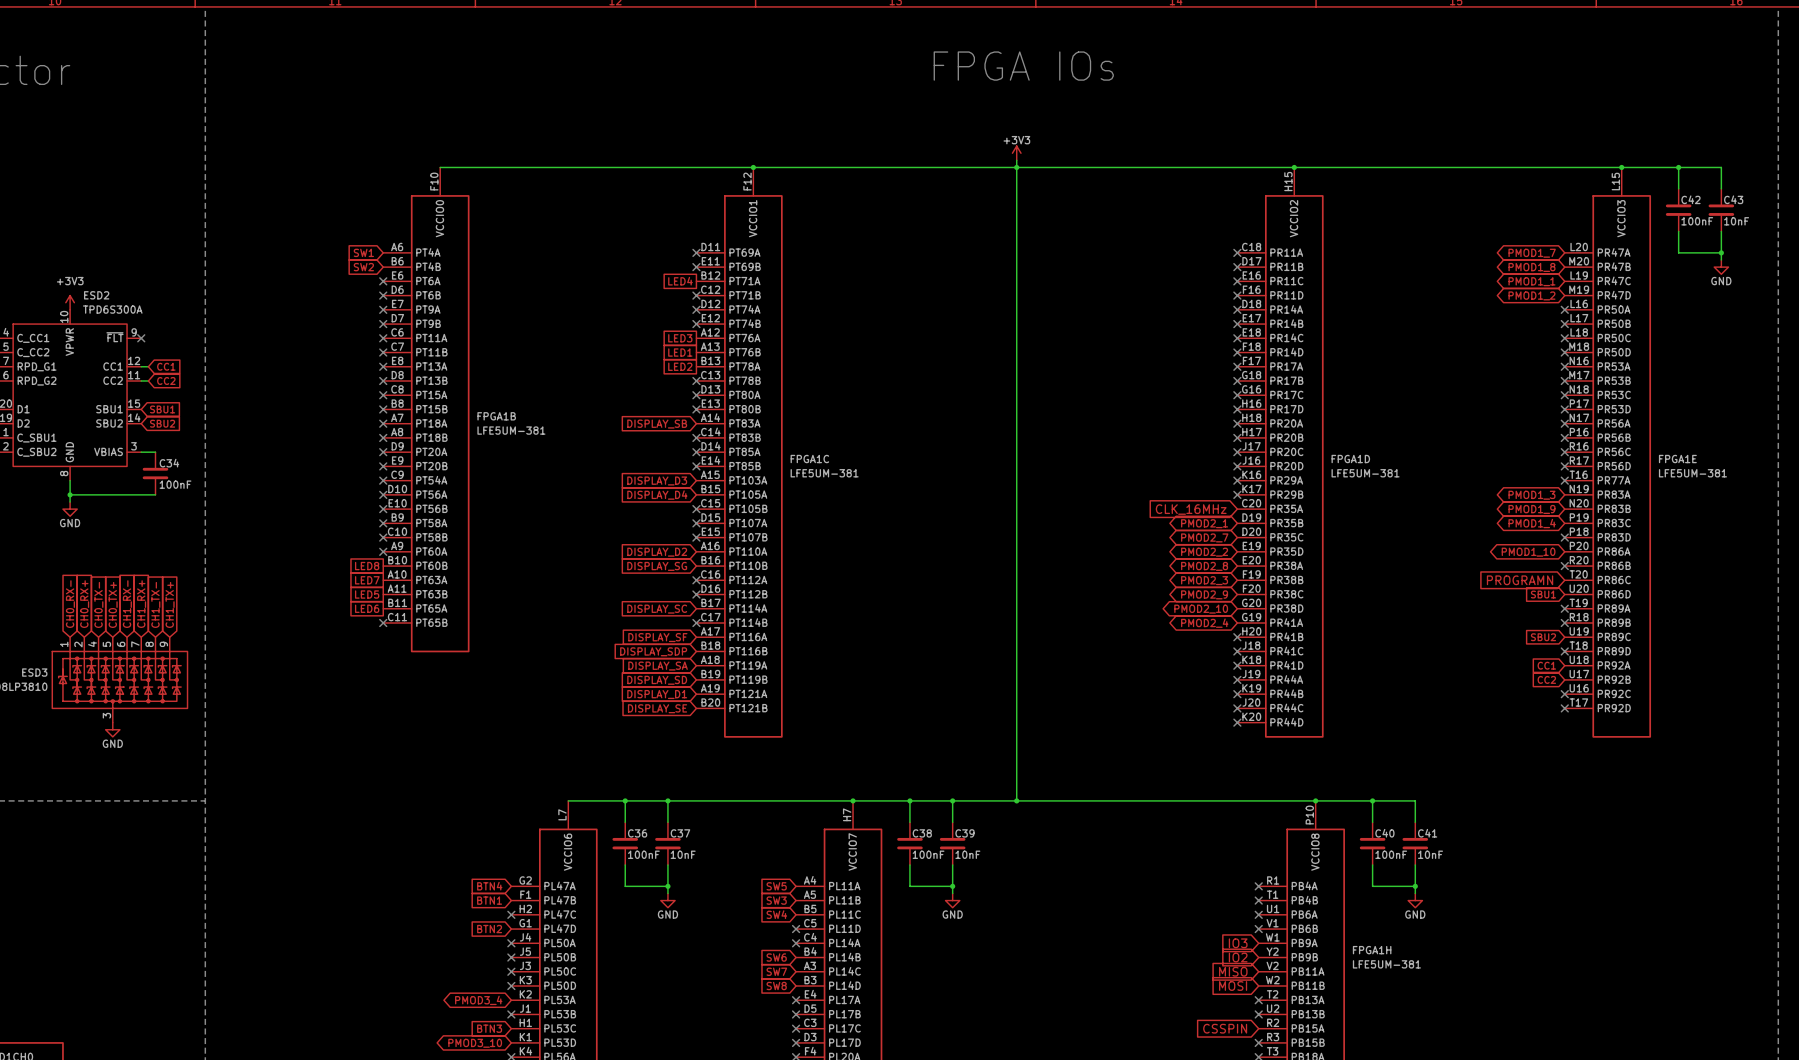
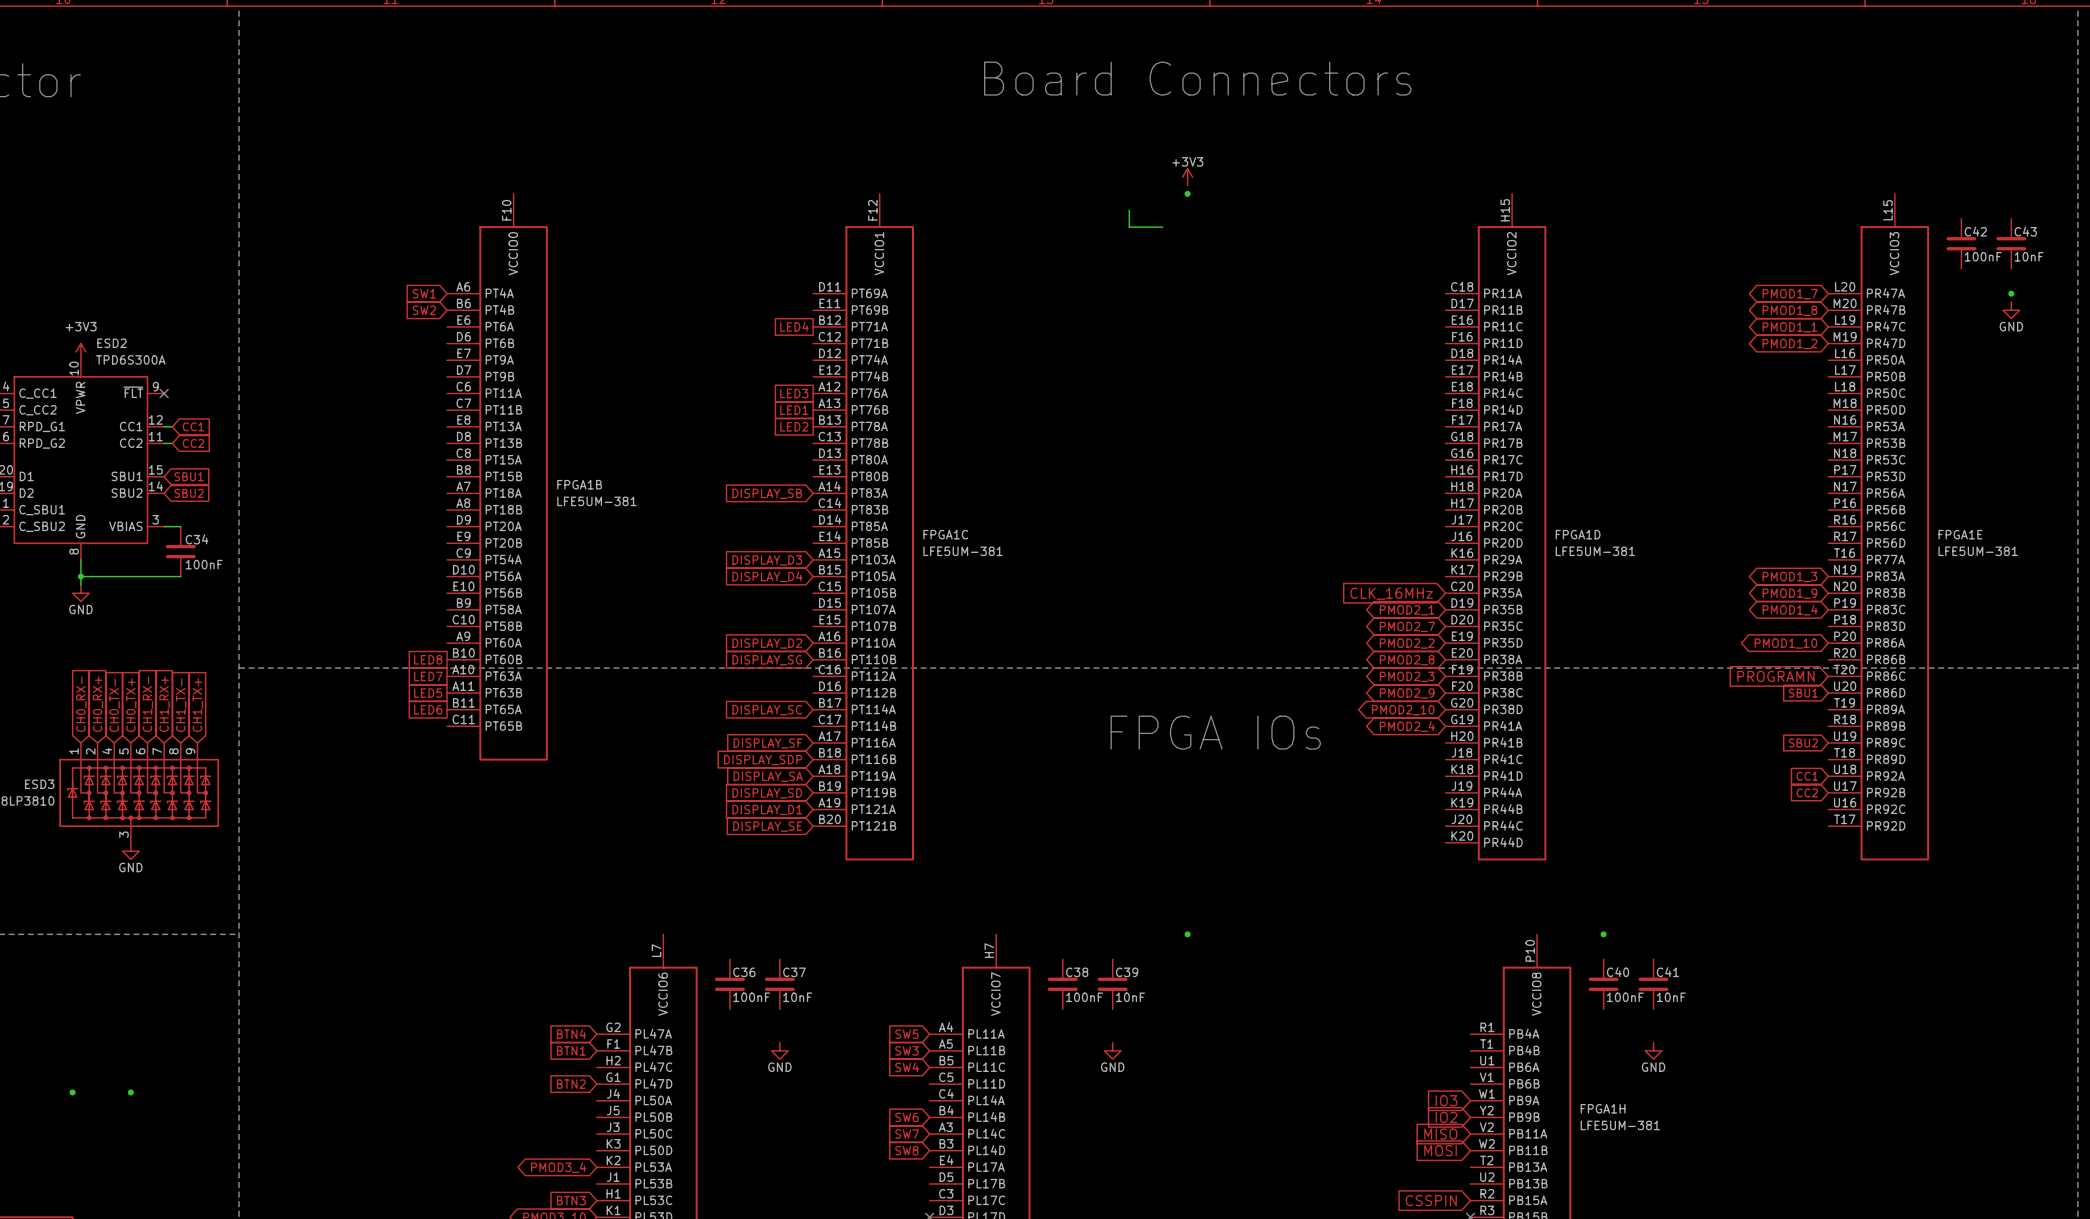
text: FPGA IOs (1023, 66) -> none
text: none -> Board Connectors (1197, 78)
wire: (1016, 160) (1016, 800) -> none
wire: (440, 167) (1721, 167) (1721, 188) -> none
junction: (753, 167) -> none
junction: (1294, 167) -> none
junction: (1621, 167) -> none
wire: (1678, 167) (1678, 188) -> none
junction: (1678, 167) -> none
wire: none -> (1129, 210) (1129, 227) (1162, 227)
wire: (1678, 231) (1678, 252) (1721, 252) -> none
wire: (1721, 231) (1721, 260) -> none
no-connect mark: (696, 252) -> none
no-connect mark: (1237, 252) -> none
no-connect mark: (696, 267) -> none
no-connect mark: (1237, 267) -> none
no-connect mark: (383, 281) -> none
no-connect mark: (1237, 281) -> none
no-connect mark: (383, 295) -> none
no-connect mark: (696, 295) -> none
no-connect mark: (1237, 295) -> none
no-connect mark: (383, 309) -> none
no-connect mark: (696, 309) -> none
no-connect mark: (1237, 309) -> none
no-connect mark: (1564, 309) -> none
no-connect mark: (383, 324) -> none
no-connect mark: (696, 324) -> none
no-connect mark: (1237, 324) -> none
no-connect mark: (1564, 324) -> none
no-connect mark: (383, 338) -> none
no-connect mark: (1237, 338) -> none
no-connect mark: (1564, 338) -> none
no-connect mark: (383, 352) -> none
no-connect mark: (1237, 352) -> none
no-connect mark: (1564, 352) -> none
no-connect mark: (383, 366) -> none
no-connect mark: (1237, 366) -> none
no-connect mark: (1564, 366) -> none
no-connect mark: (383, 381) -> none
no-connect mark: (696, 381) -> none
no-connect mark: (1237, 381) -> none
no-connect mark: (1564, 381) -> none
no-connect mark: (383, 395) -> none
no-connect mark: (696, 395) -> none
no-connect mark: (1237, 395) -> none
no-connect mark: (1564, 395) -> none
no-connect mark: (383, 409) -> none
no-connect mark: (696, 409) -> none
no-connect mark: (1237, 409) -> none
no-connect mark: (1564, 409) -> none
no-connect mark: (383, 423) -> none
no-connect mark: (1237, 423) -> none
no-connect mark: (1564, 423) -> none
no-connect mark: (383, 437) -> none
no-connect mark: (696, 437) -> none
no-connect mark: (1237, 437) -> none
no-connect mark: (1564, 437) -> none
no-connect mark: (383, 452) -> none
no-connect mark: (696, 452) -> none
no-connect mark: (1237, 452) -> none
no-connect mark: (1564, 452) -> none
no-connect mark: (383, 466) -> none
no-connect mark: (696, 466) -> none
no-connect mark: (1237, 466) -> none
no-connect mark: (1564, 466) -> none
no-connect mark: (383, 480) -> none
no-connect mark: (1237, 480) -> none
no-connect mark: (1564, 480) -> none
no-connect mark: (383, 494) -> none
no-connect mark: (1237, 494) -> none
no-connect mark: (383, 509) -> none
no-connect mark: (696, 509) -> none
no-connect mark: (383, 523) -> none
no-connect mark: (696, 523) -> none
no-connect mark: (383, 537) -> none
no-connect mark: (696, 537) -> none
no-connect mark: (1564, 537) -> none
no-connect mark: (383, 551) -> none
no-connect mark: (1564, 566) -> none
line: none -> (239, 668) (2077, 668)
no-connect mark: (696, 580) -> none
no-connect mark: (696, 594) -> none
no-connect mark: (1564, 608) -> none
no-connect mark: (383, 622) -> none
no-connect mark: (696, 622) -> none
no-connect mark: (1564, 622) -> none
text: none -> FPGA IOs (1215, 732)
no-connect mark: (1237, 637) -> none
no-connect mark: (1237, 651) -> none
no-connect mark: (1564, 651) -> none
no-connect mark: (1237, 665) -> none
no-connect mark: (1237, 679) -> none
no-connect mark: (1237, 694) -> none
no-connect mark: (1564, 694) -> none
no-connect mark: (1237, 708) -> none
no-connect mark: (1564, 708) -> none
no-connect mark: (1237, 722) -> none
wire: (568, 800) (1415, 800) (1415, 822) -> none
wire: (625, 800) (625, 822) -> none
junction: (625, 800) -> none
wire: (667, 800) (667, 822) -> none
junction: (667, 800) -> none
junction: (853, 800) -> none
wire: (909, 800) (909, 822) -> none
junction: (909, 800) -> none
wire: (952, 800) (952, 822) -> none
junction: (952, 800) -> none
junction: (1315, 800) -> none
wire: (1372, 800) (1372, 822) -> none
wire: (625, 864) (625, 886) (667, 886) -> none
wire: (667, 864) (667, 893) -> none
wire: (909, 864) (909, 886) (952, 886) -> none
wire: (952, 864) (952, 893) -> none
wire: (1372, 864) (1372, 886) (1415, 886) -> none
wire: (1415, 864) (1415, 893) -> none
junction: (667, 886) -> none
junction: (952, 886) -> none
no-connect mark: (1258, 886) -> none
junction: (1415, 886) -> none
no-connect mark: (1258, 900) -> none
no-connect mark: (511, 914) -> none
no-connect mark: (1258, 914) -> none
no-connect mark: (796, 929) -> none
no-connect mark: (1258, 929) -> none
junction: none -> (72, 1092)
junction: none -> (130, 1092)
no-connect mark: (511, 943) -> none
no-connect mark: (796, 943) -> none
no-connect mark: (511, 957) -> none
no-connect mark: (511, 971) -> none
no-connect mark: (511, 985) -> none
no-connect mark: (796, 1000) -> none
no-connect mark: (1258, 1000) -> none
no-connect mark: (511, 1014) -> none
no-connect mark: (796, 1014) -> none
no-connect mark: (1258, 1014) -> none
no-connect mark: (796, 1028) -> none

